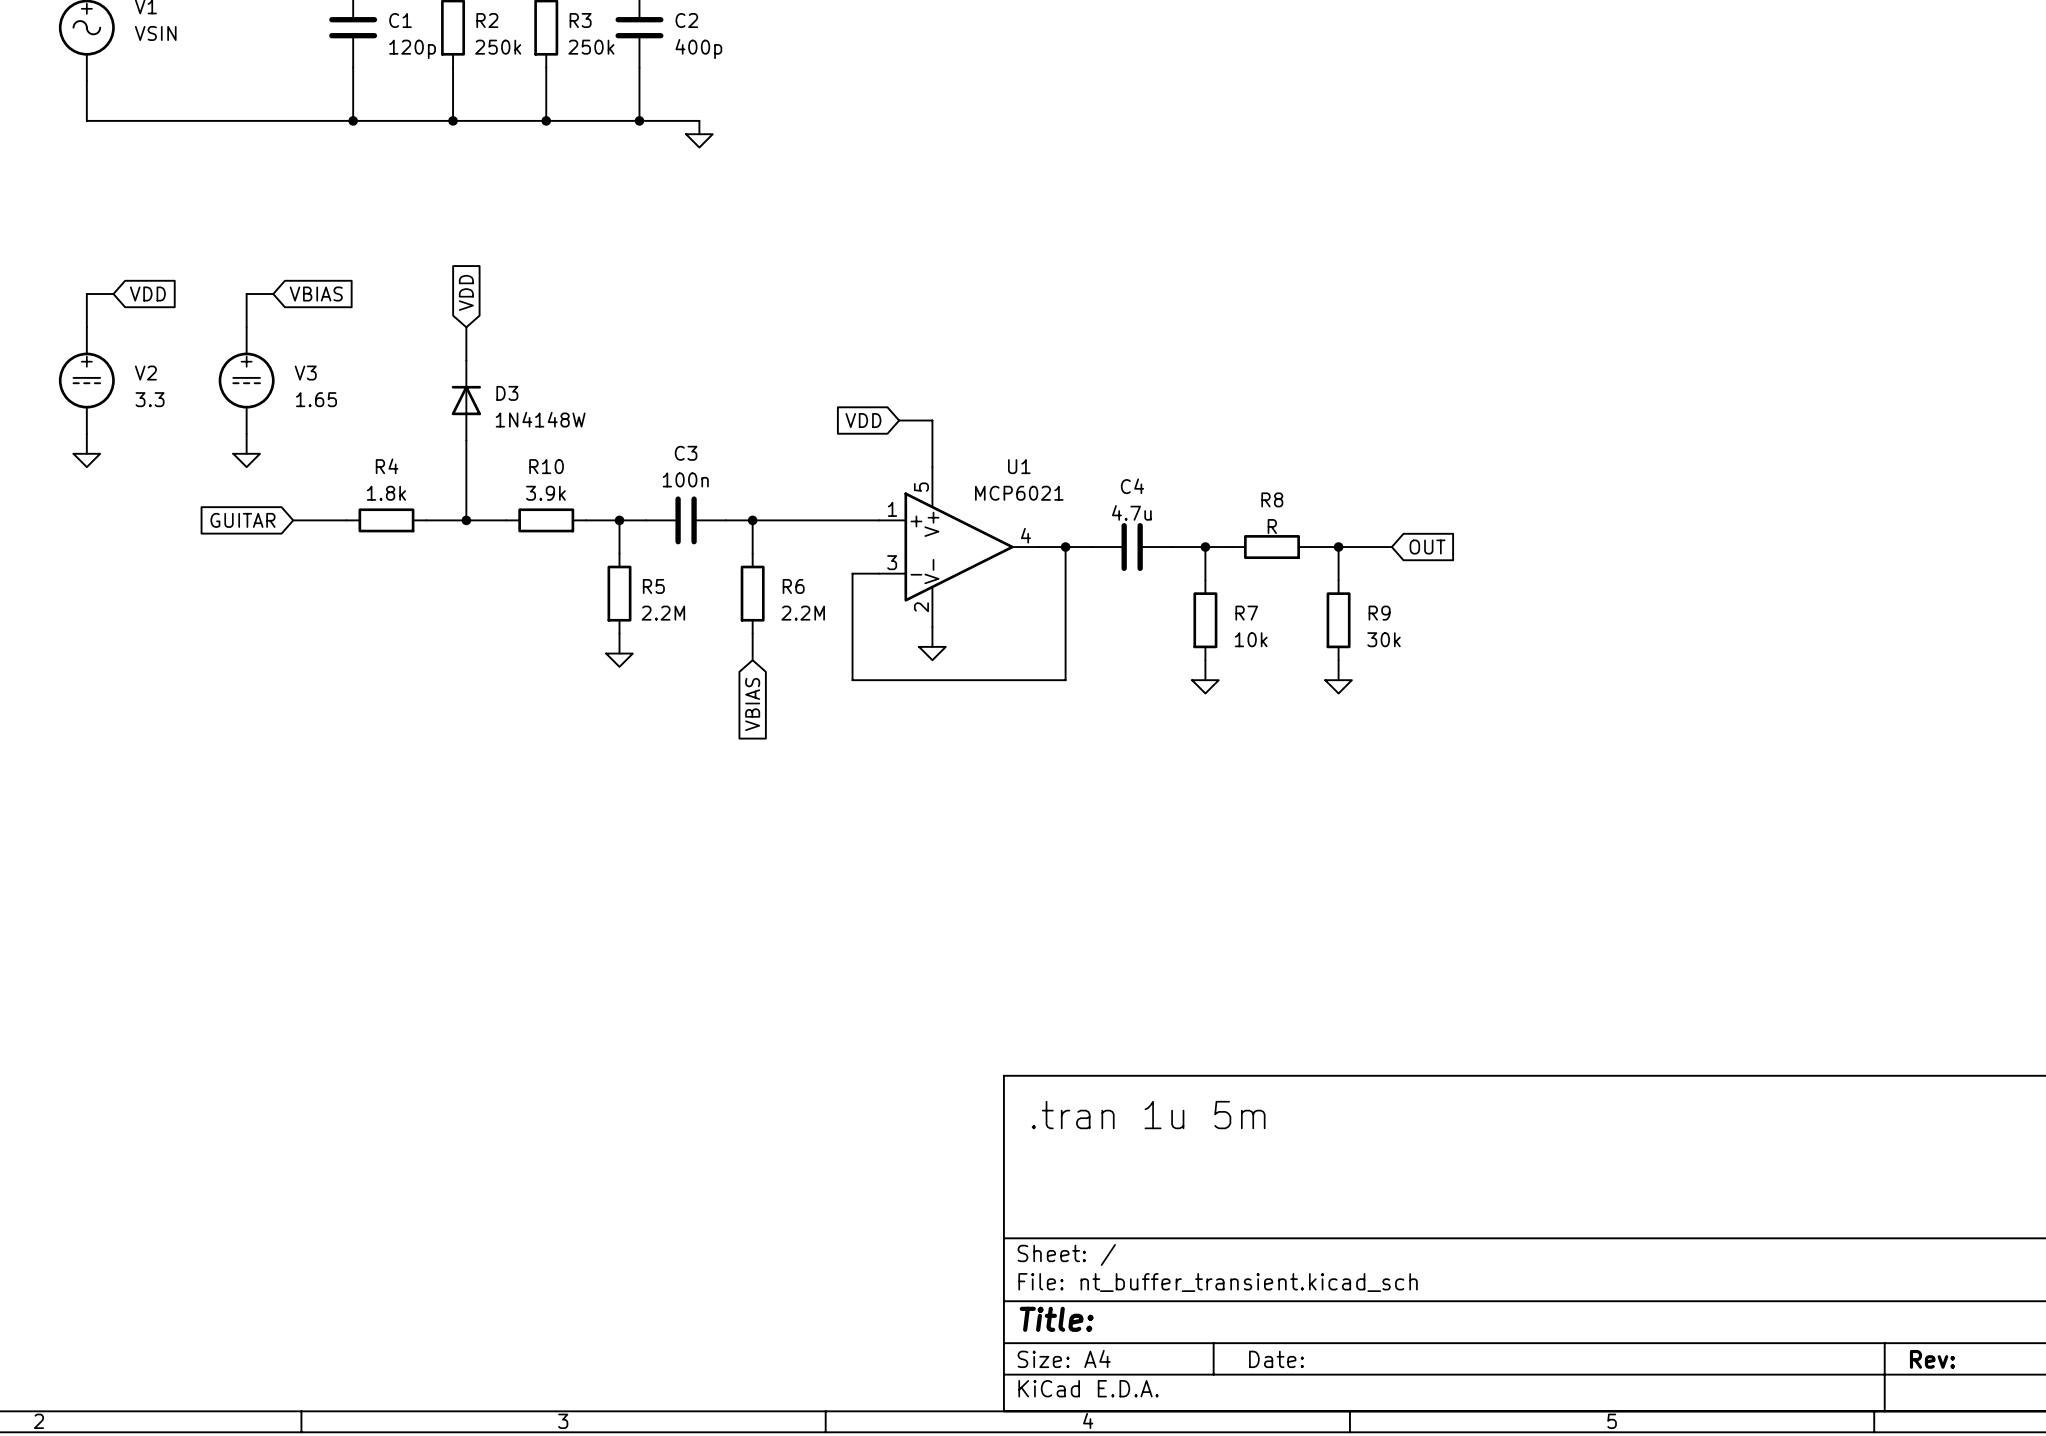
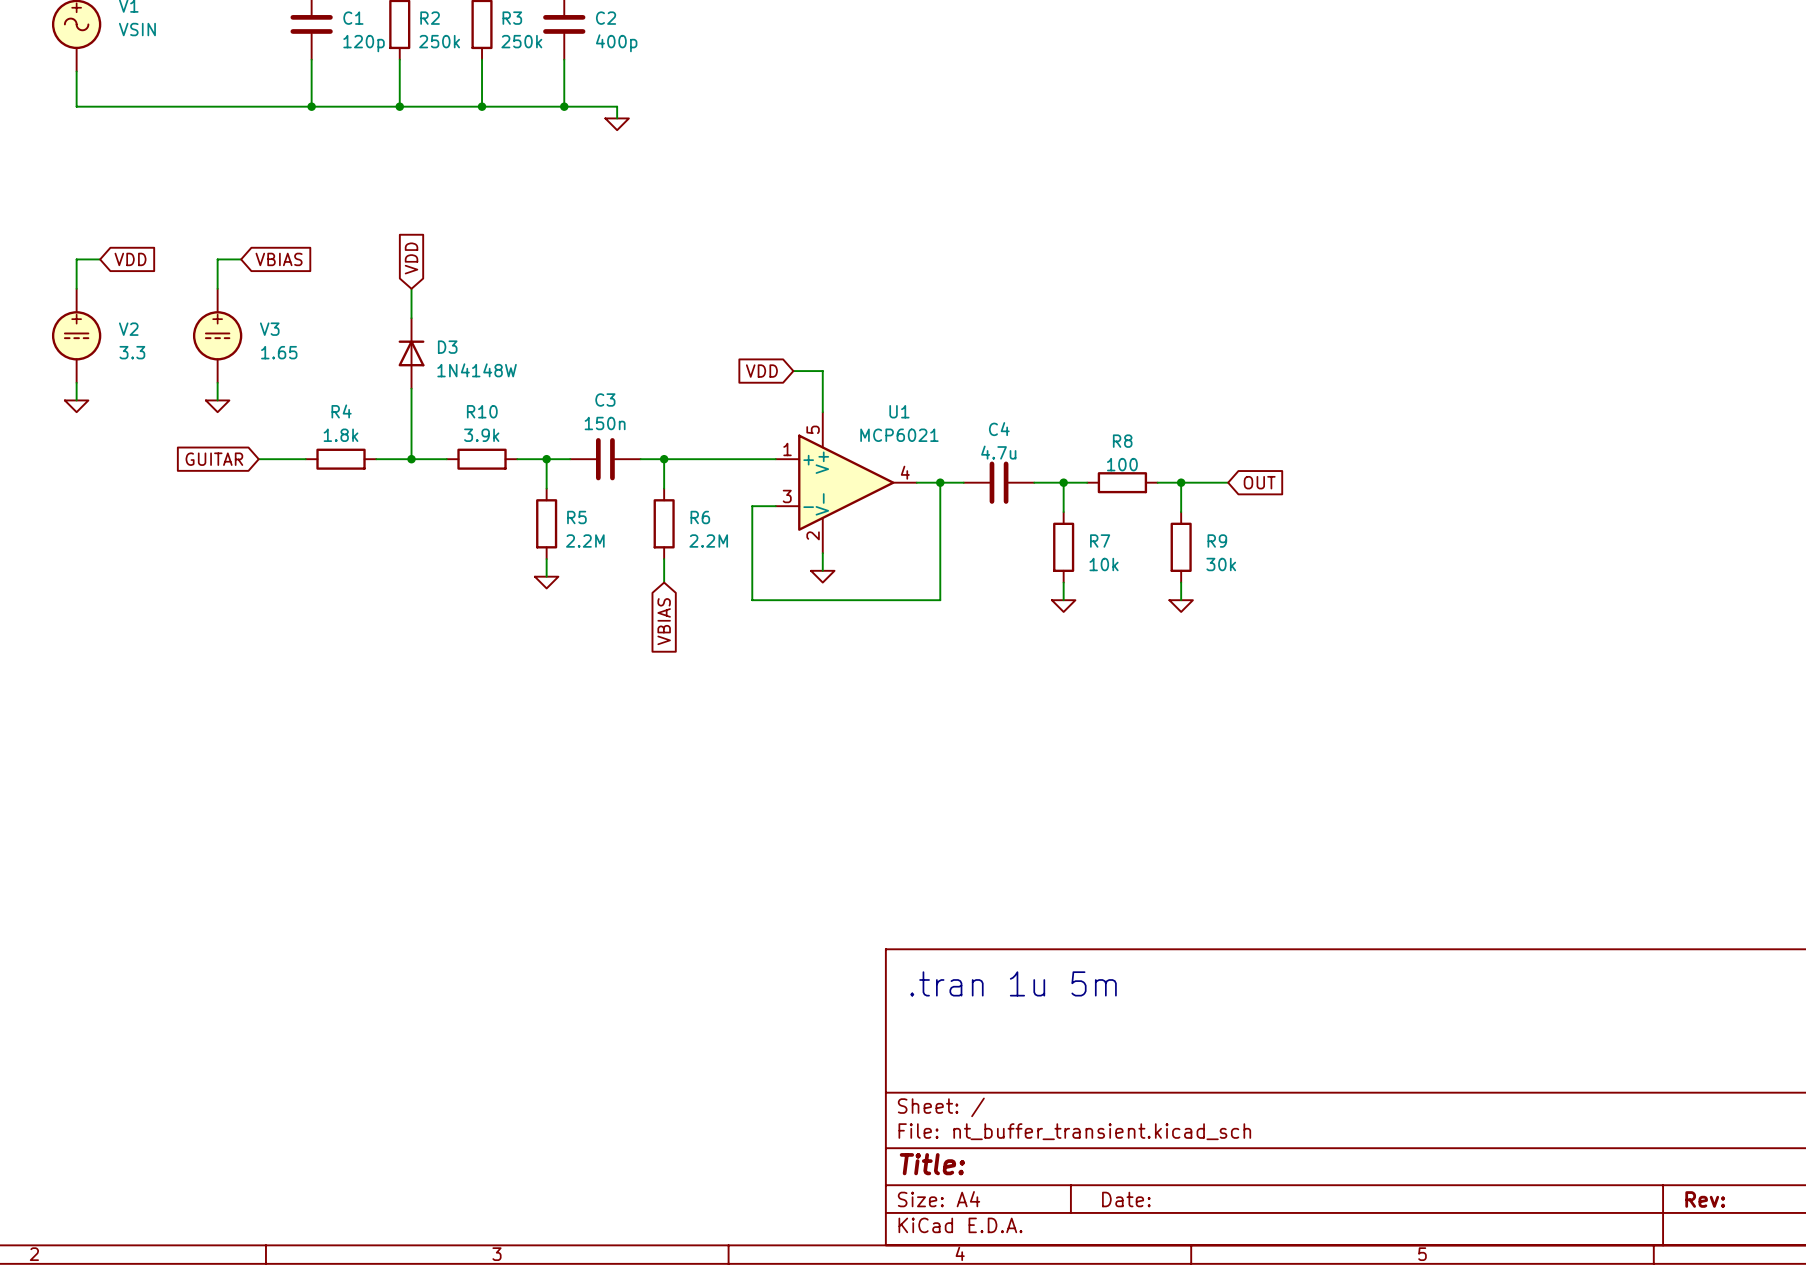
C3 value: 100n (685, 479) -> 150n (605, 423)
R8 value: R (1272, 526) -> 100 (1122, 464)

